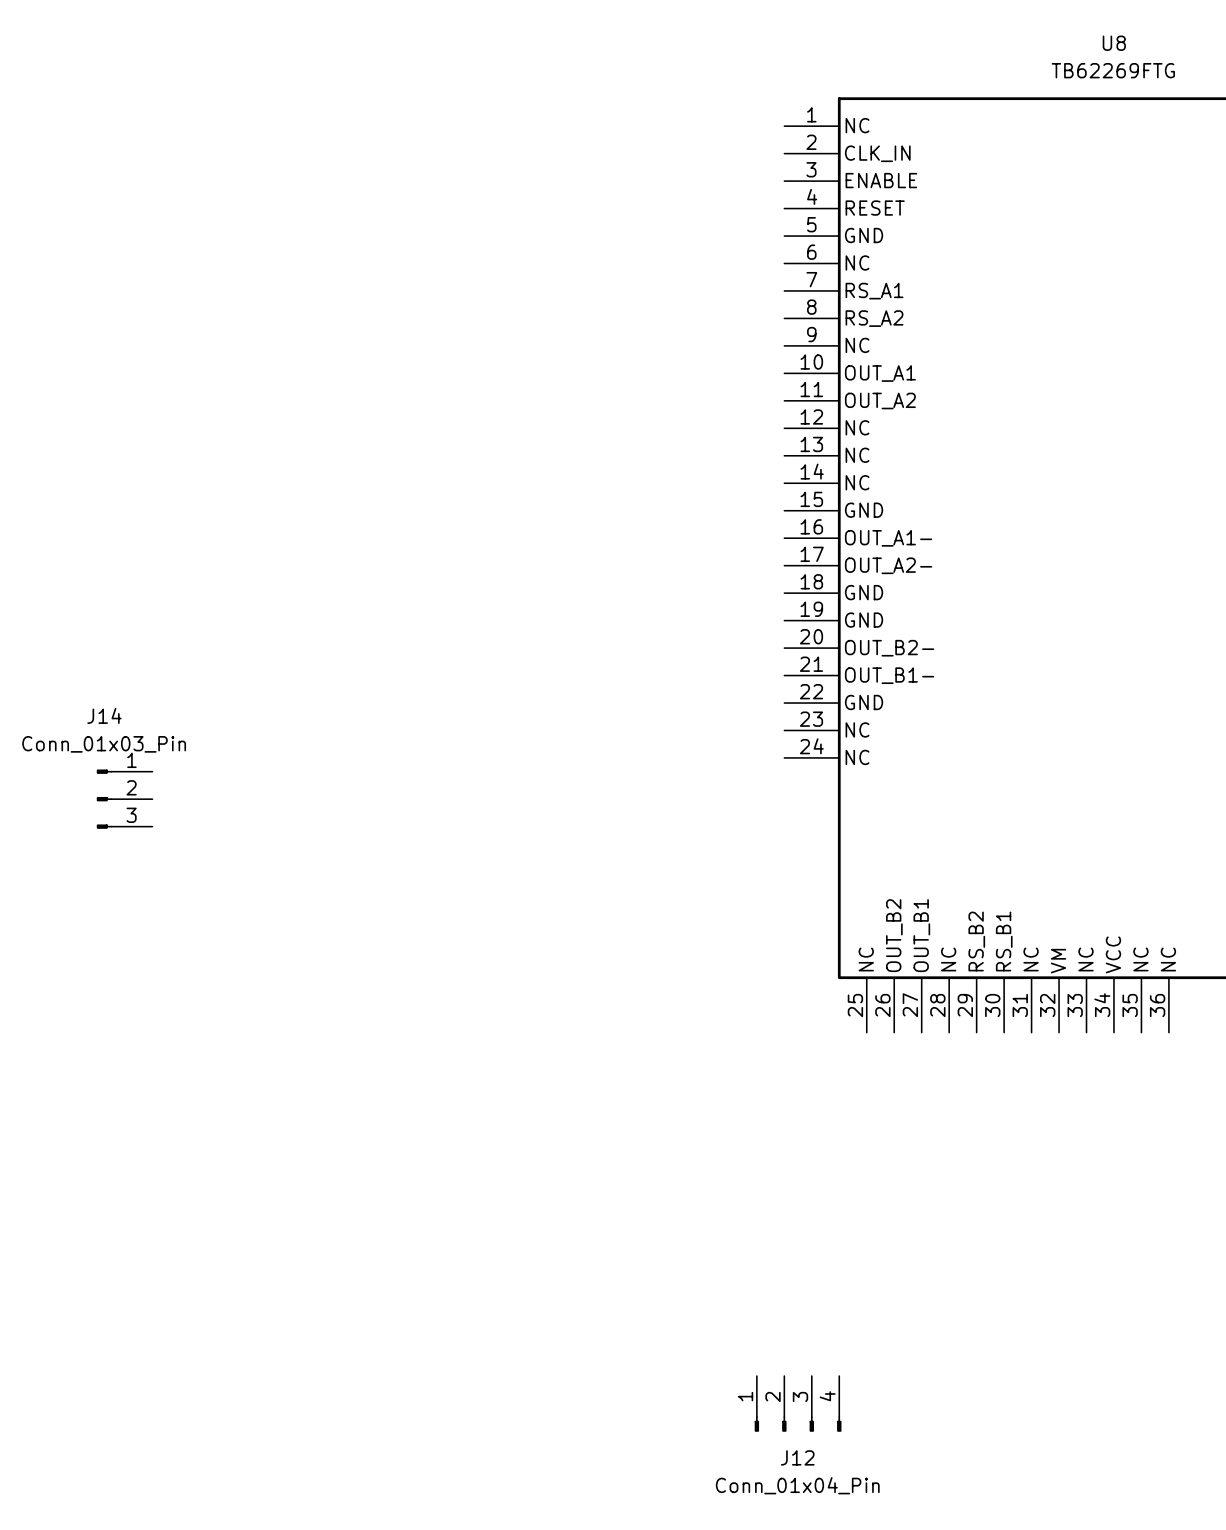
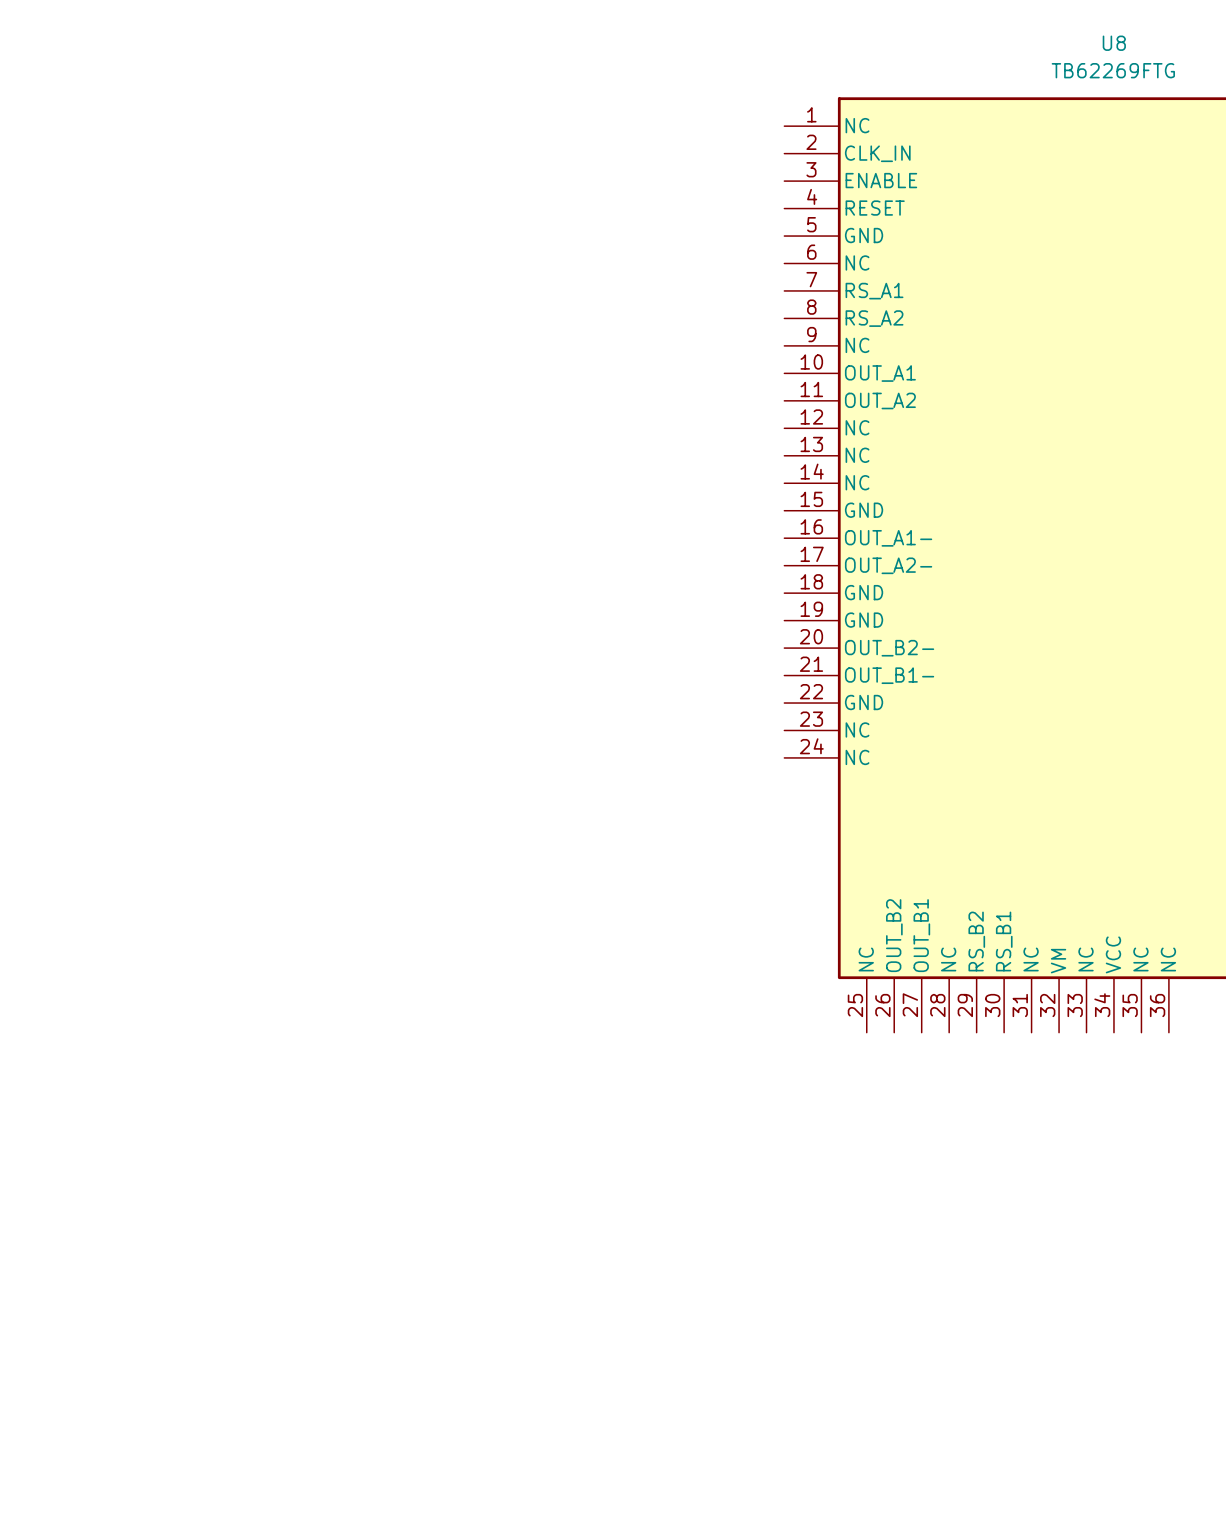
J14: Conn_01x03_Pin (124, 799) -> none
J12: Conn_01x04_Pin (798, 1403) -> none

